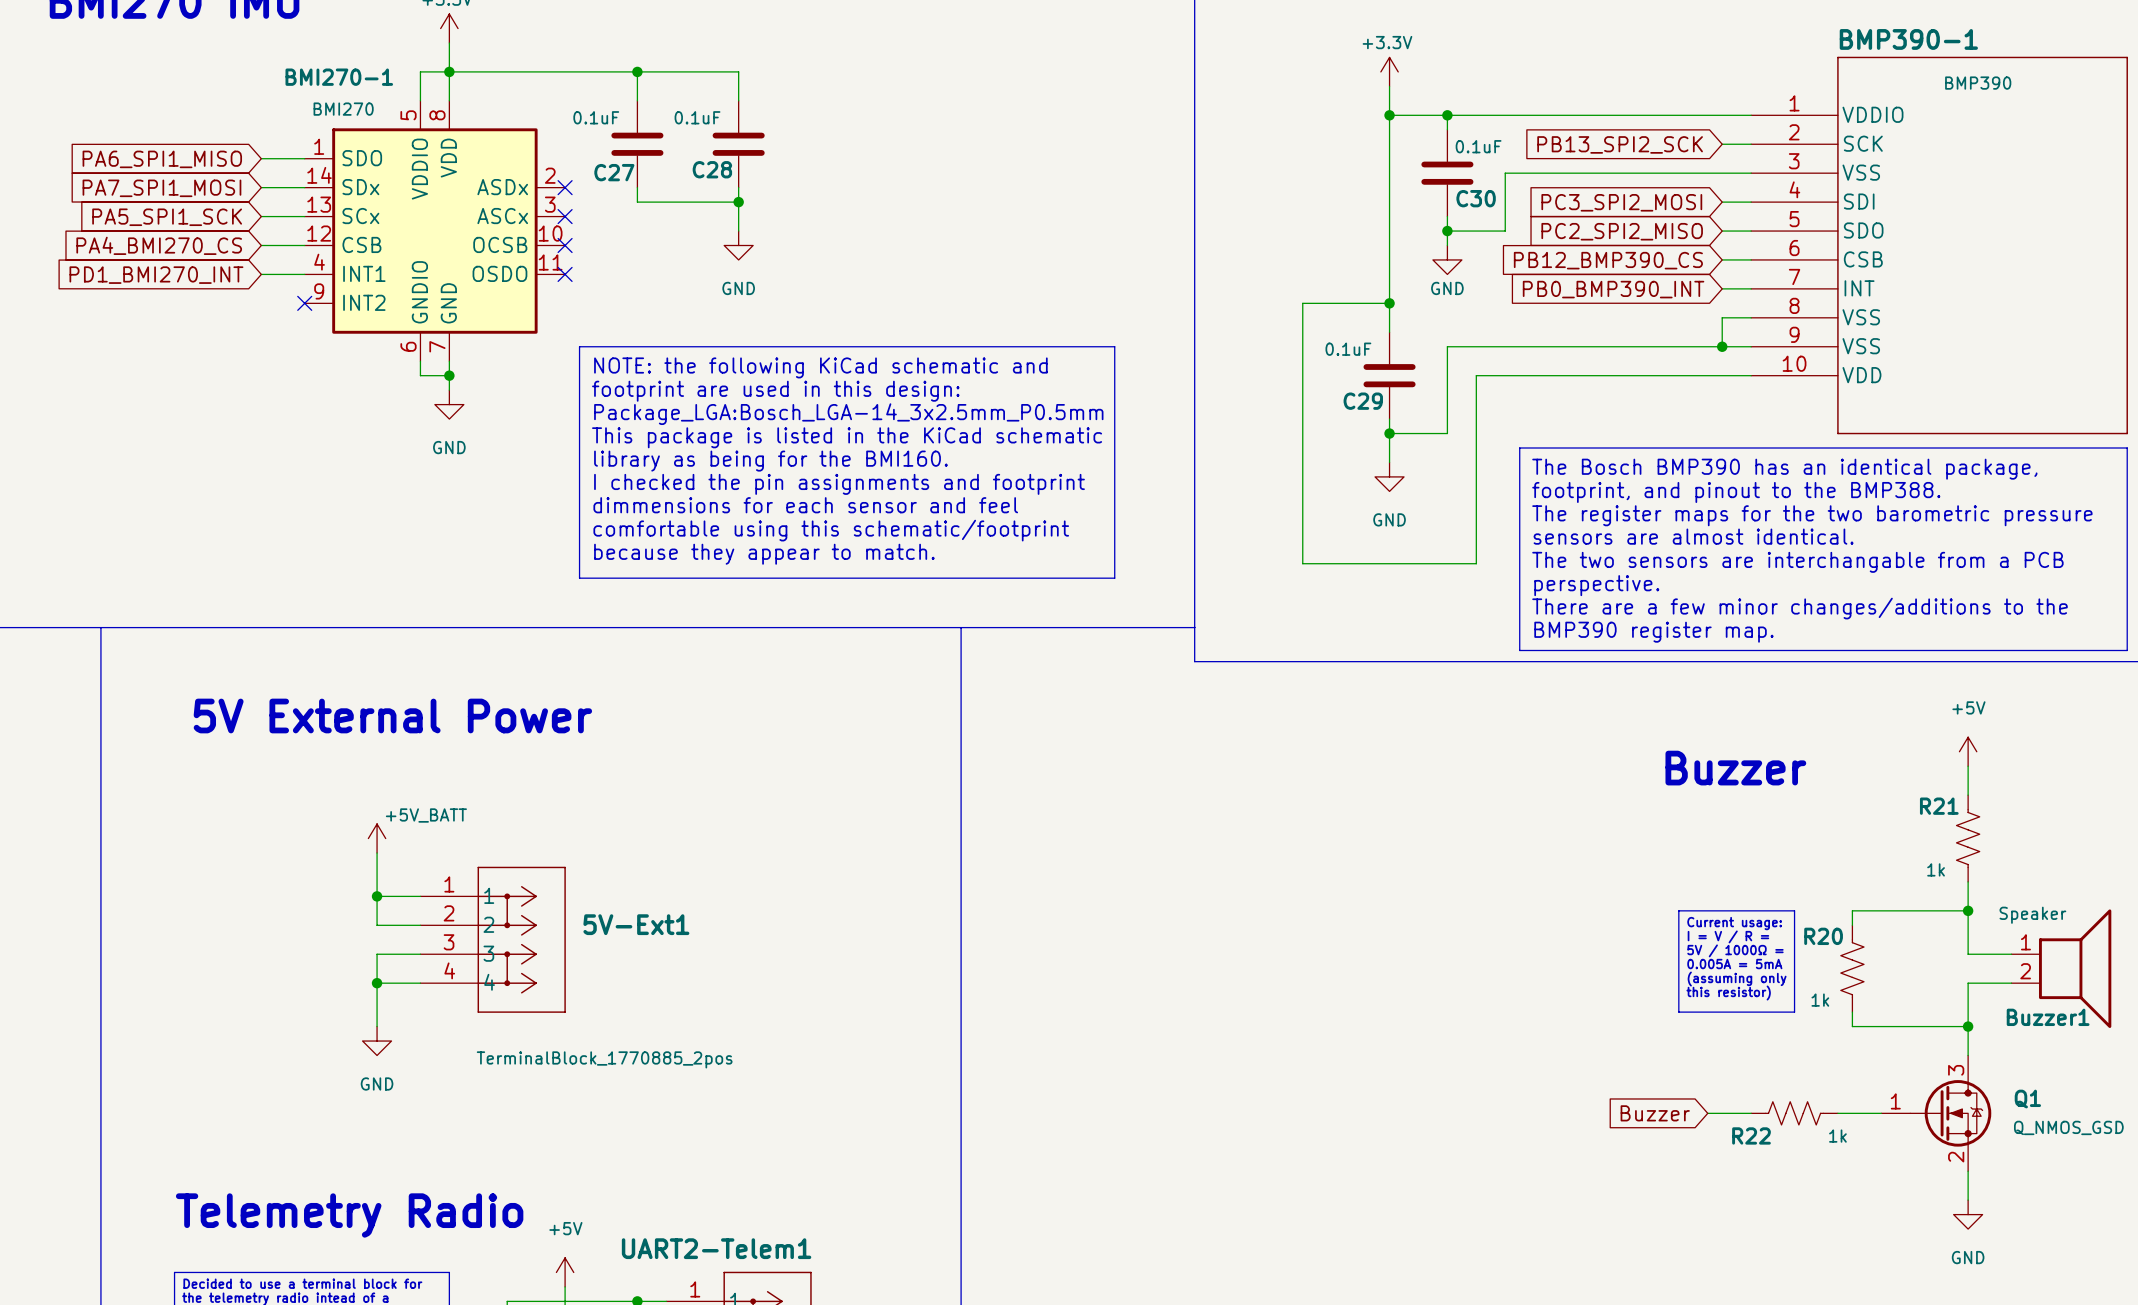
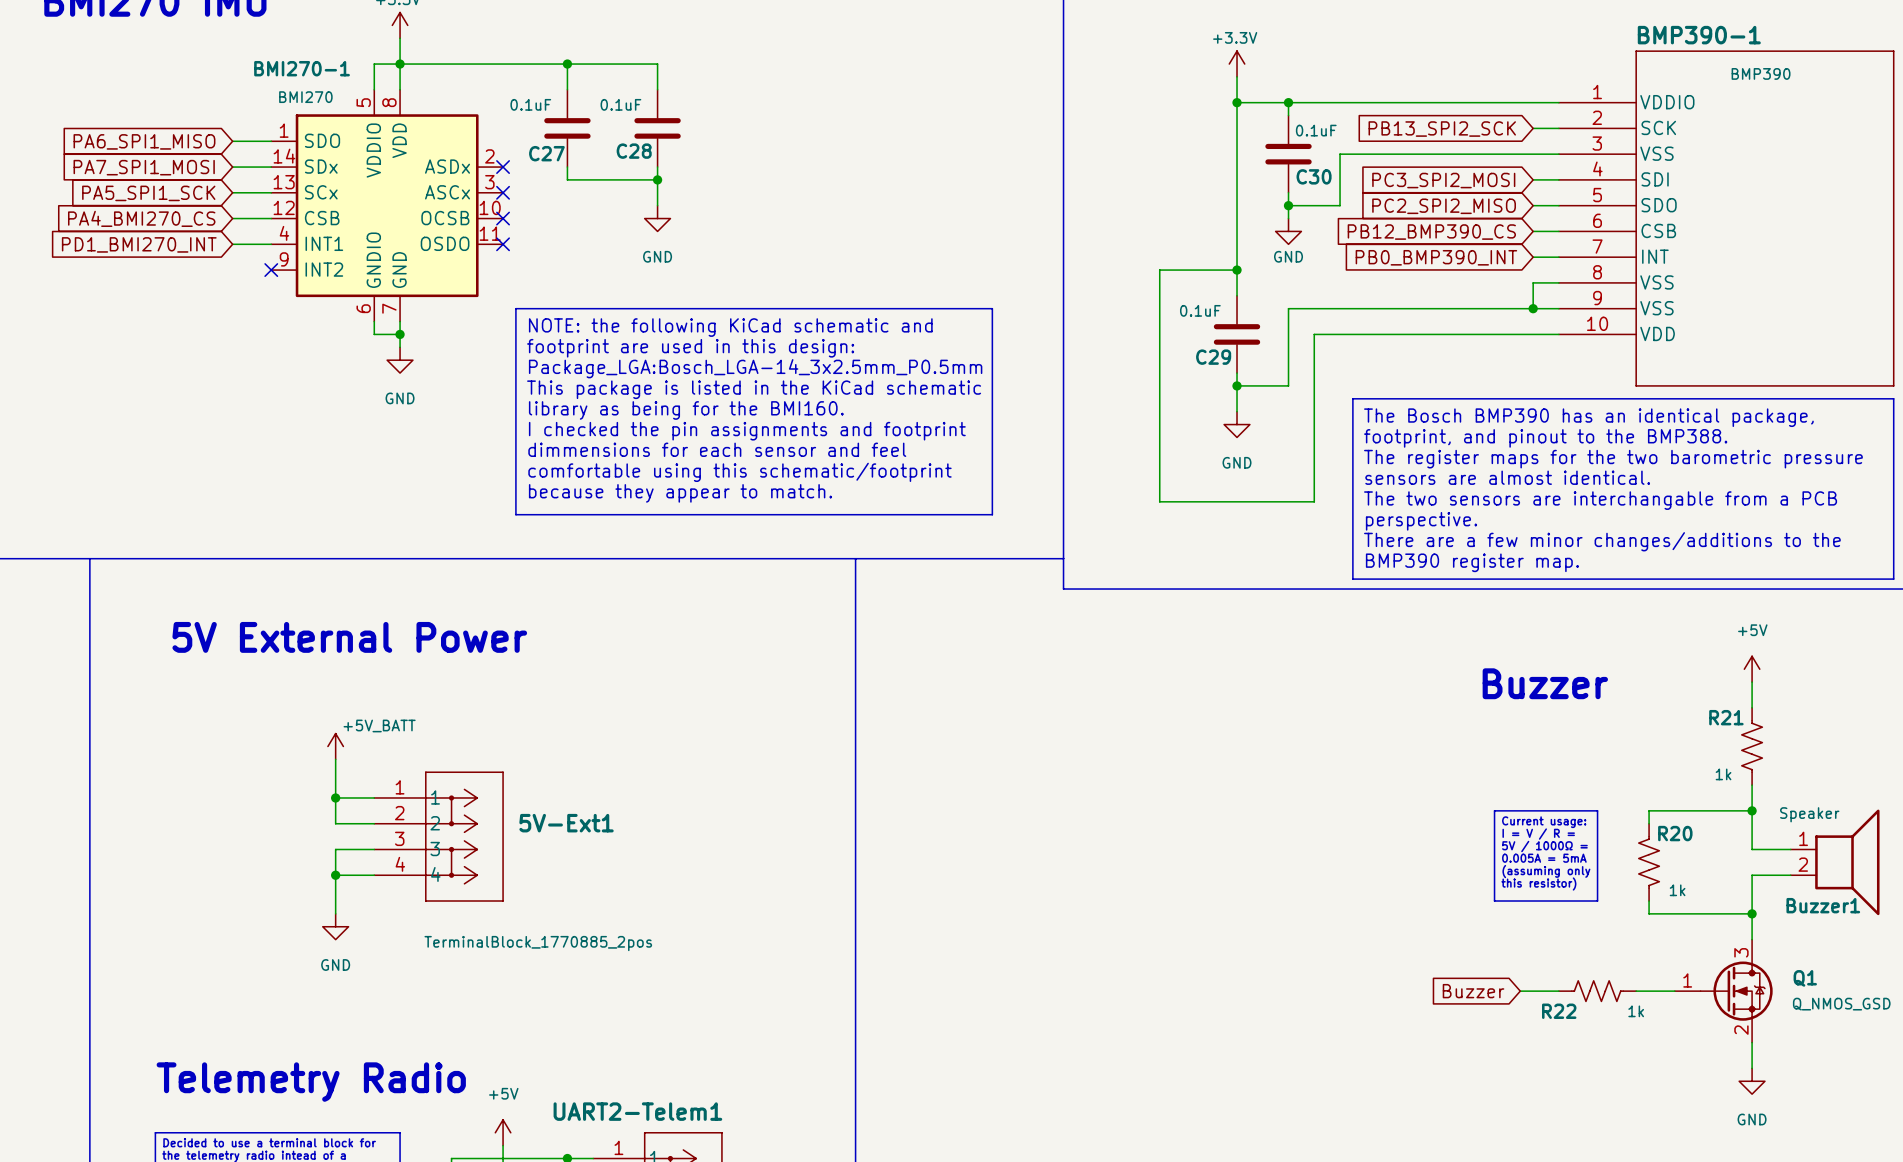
R20 flip: as is (1852, 968) -> left-right (1649, 862)

